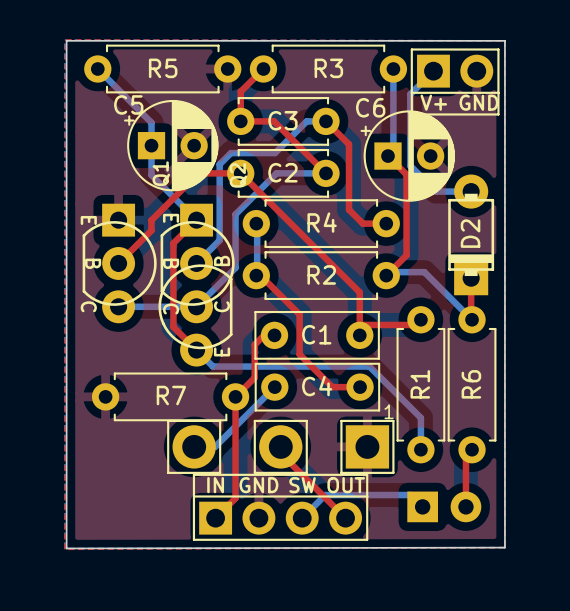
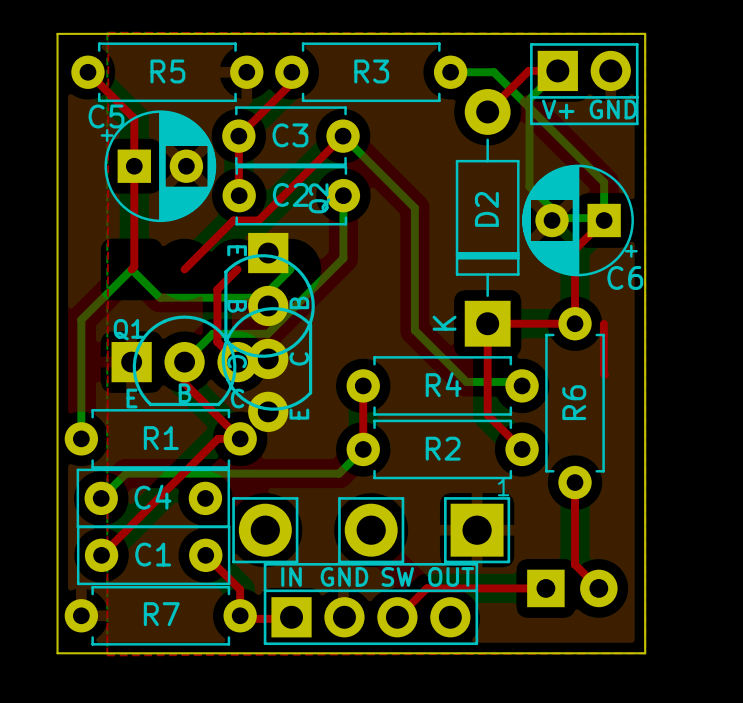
board edge: (66, 40) (66, 548) (504, 547) -> (109, 33) (57, 33) (57, 653) (645, 653)
bottom track: (97, 68) (151, 122) (151, 175) (196, 220) -> none
R5 position: (162, 68) -> (167, 72)
top track: (263, 68) (240, 91) (240, 121) (274, 121) (325, 173) -> none
R3 position: (328, 68) -> (371, 72)
bottom track: (393, 68) (393, 150) -> none
top track: none -> (557, 70) (528, 70) (487, 111)
top track: none -> (87, 72) (134, 118) (134, 266) (131, 269)
top track: none -> (291, 72) (291, 83) (238, 136) (238, 195)
bottom track: none -> (450, 72) (493, 72) (604, 182) (604, 220)
C3 position: (283, 121) -> (290, 136)
bottom track: (325, 121) (306, 121) (275, 153) (230, 153) (219, 164) (219, 240) (196, 263) -> none
top track: (325, 121) (349, 144) (349, 209) (362, 223) (386, 223) -> none
bottom track: none -> (343, 136) (414, 207) (414, 330) (466, 381) (518, 381) (522, 385)
top track: none -> (343, 136) (258, 220) (233, 220) (184, 269)
C5 position: (171, 145) -> (158, 166)
top track: (393, 150) (388, 156) (406, 174) (406, 255) (386, 275) -> none
C6 rotation: 0° (407, 156) -> 180° (580, 220)
C6 position: (407, 156) -> (580, 220)
Q1 name position: Q1 (161, 173) -> Q1 (128, 329)
bottom track: none -> (343, 195) (343, 258) (267, 333) (212, 333) (184, 362)
C2 position: (283, 173) -> (291, 195)
bottom track: (325, 173) (276, 173) (235, 214) (235, 267) (196, 306) (118, 306) -> none
D2 footprint: [448, 174, 495, 296] -> [455, 89, 520, 347]
top track: none -> (604, 220) (575, 249) (575, 323) (487, 323) (487, 415) (522, 449)
top track: (196, 220) (173, 243) (173, 326) (196, 350) -> none
R4 position: (321, 223) -> (442, 385)
bottom track: (257, 224) (257, 272) -> none
top track: none -> (237, 269) (217, 289) (217, 341) (237, 362)
bottom track: none -> (290, 269) (262, 297) (159, 297) (131, 269) (81, 319) (81, 438)
top track: (118, 263) (151, 230) (151, 220) (198, 173) (240, 173) (359, 292) (359, 324) (415, 324) (420, 319) -> none
Q1 rotation: 0° (119, 263) -> 90° counterclockwise (184, 360)
top track: (257, 272) (299, 314) (299, 354) (332, 387) (360, 387) -> none
bottom track: (387, 272) (424, 272) (472, 319) -> none
R2 position: (321, 275) -> (442, 449)
top track: none -> (184, 362) (184, 383) (240, 438) (218, 438) (101, 555)
top track: (274, 324) (254, 344) (254, 377) (235, 396) (235, 498) (215, 518) -> none
top track: none -> (363, 385) (363, 449)
C1 position: (317, 335) -> (153, 555)
bottom track: (196, 350) (213, 366) (369, 366) (420, 417) (420, 449) -> none
bottom track: none -> (363, 449) (339, 473) (126, 473) (101, 498)
R1 rotation: 0° (420, 384) -> 90° clockwise (160, 438)
R1 position: (420, 384) -> (160, 438)
R6 position: (472, 384) -> (575, 403)
bottom track: (274, 387) (215, 446) (194, 446) -> none
C4 position: (317, 387) -> (153, 498)
R7 position: (170, 396) -> (160, 615)
top track: none -> (575, 482) (575, 564) (598, 588)
top track: (280, 446) (280, 453) (345, 518) -> none
top track: (465, 455) (465, 506) -> none
top track: none -> (205, 555) (240, 589) (240, 615) (243, 618) (290, 618)
top track: none -> (545, 588) (426, 588) (396, 618)
bottom track: (422, 506) (410, 495) (325, 495) (302, 518) -> none
part position: (444, 506) -> (572, 588)

